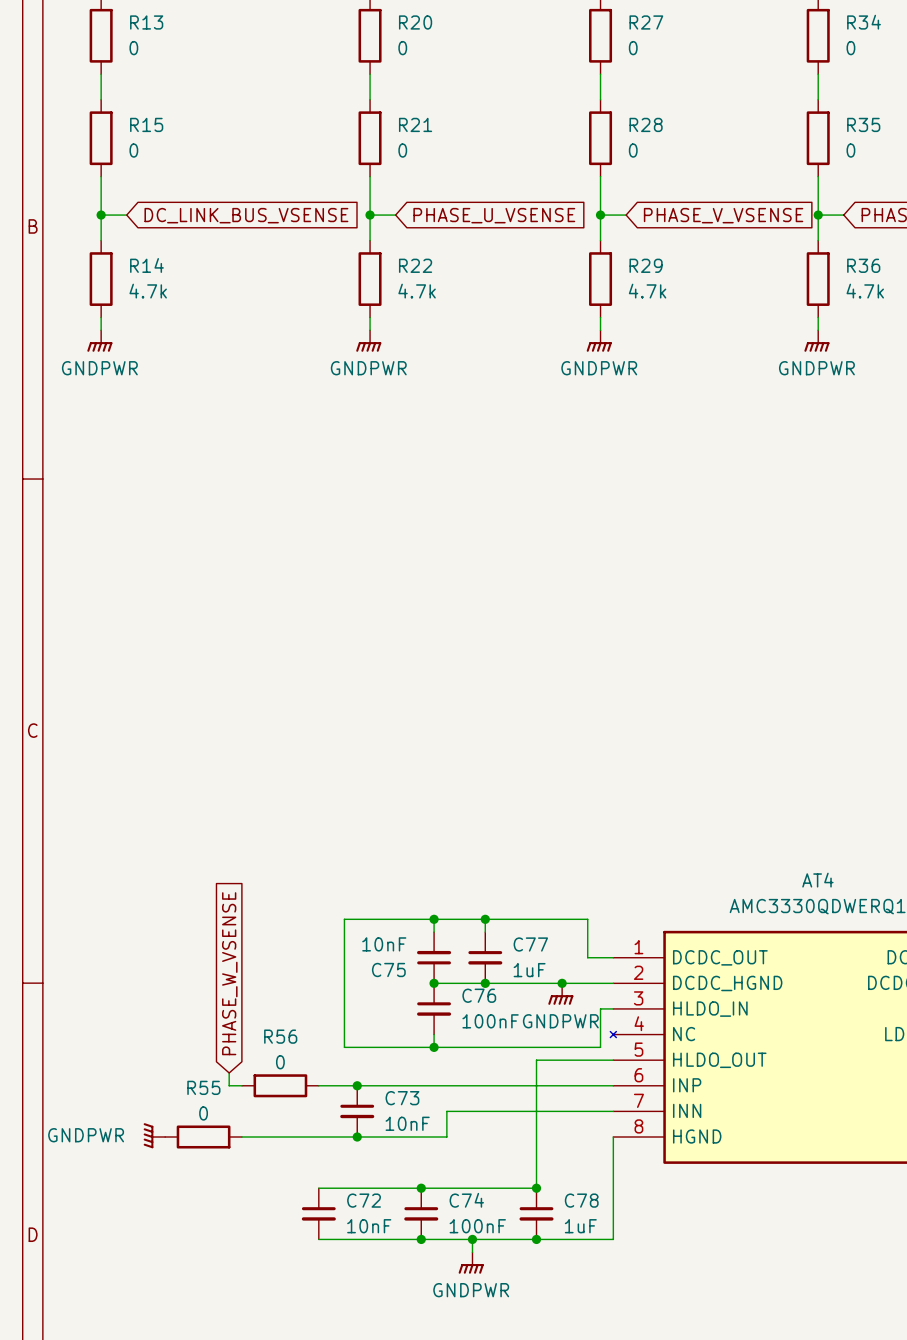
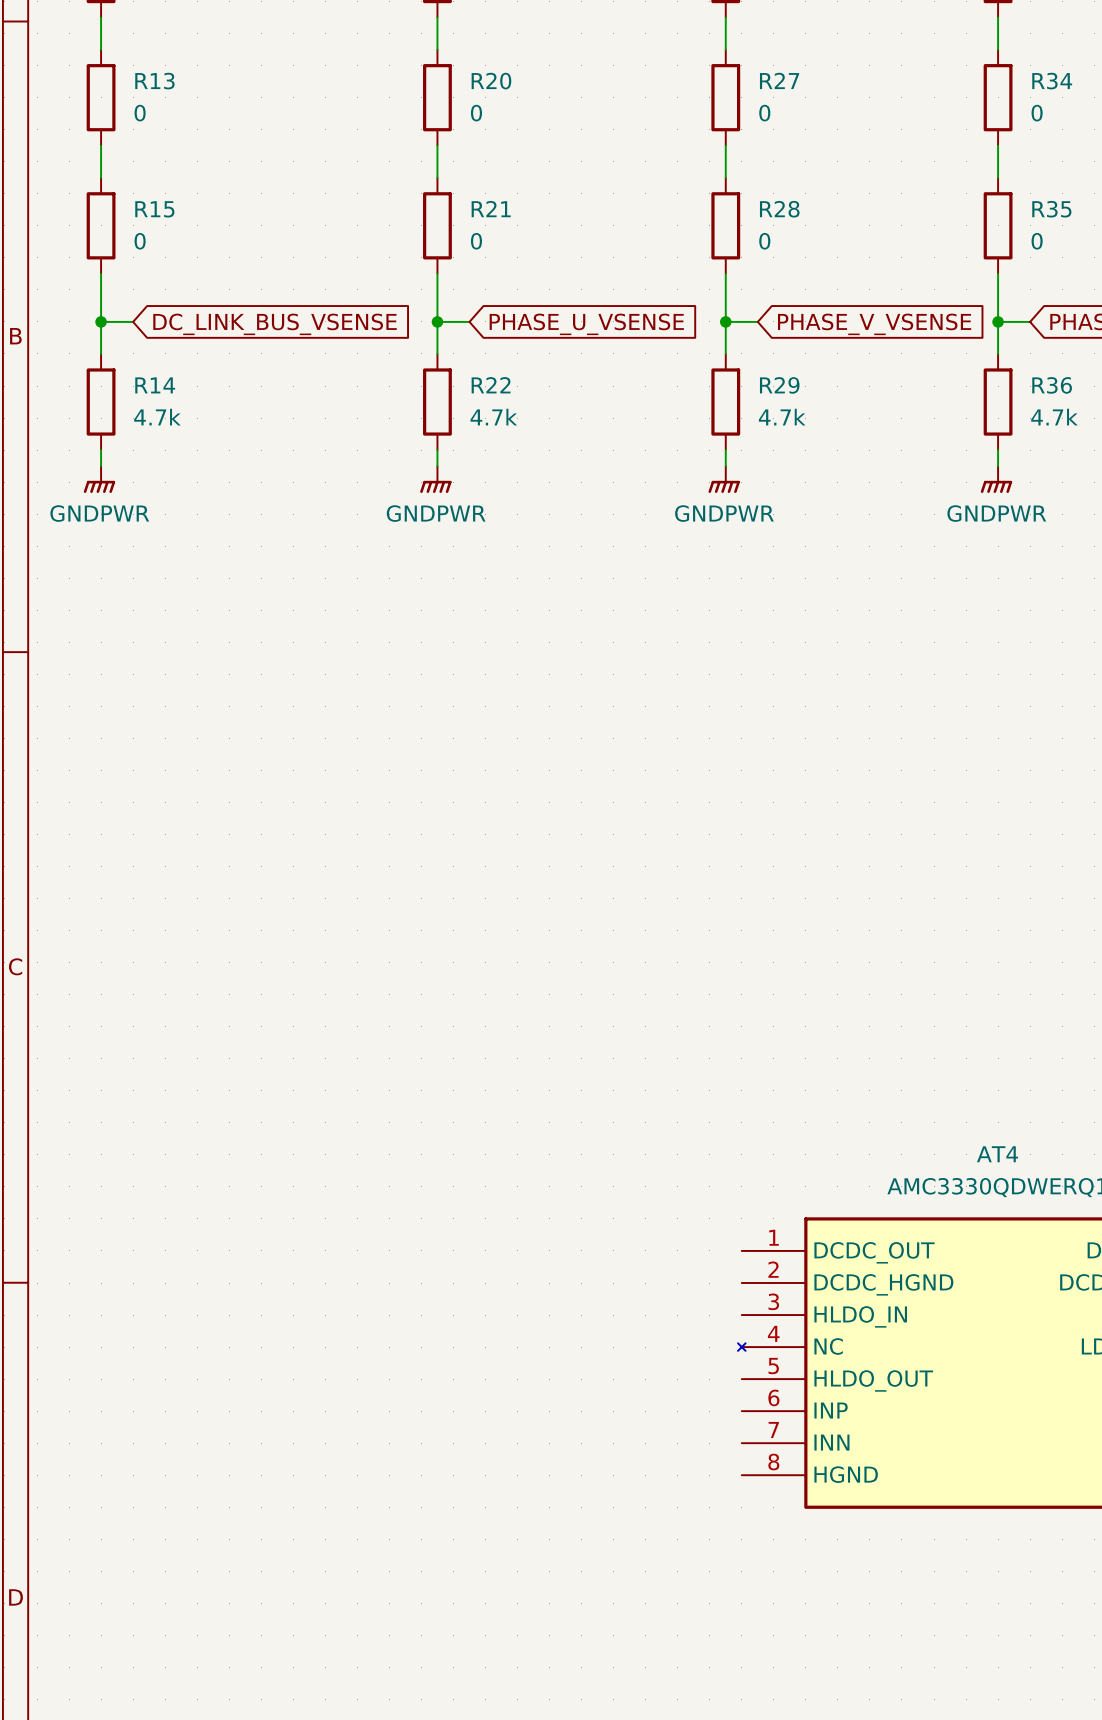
wire: (434, 919) (434, 932) -> none
junction: (434, 919) -> none
wire: (485, 919) (485, 932) -> none
junction: (485, 919) -> none
C75: 10nF (434, 957) -> none
C77: 1uF (485, 957) -> none
wire: (613, 957) (587, 957) (587, 919) (344, 919) (344, 1047) (600, 1047) (600, 1008) (613, 1008) -> none
global label: PHASE_W_VSENSE (229, 973) -> none
wire: (434, 983) (613, 983) -> none
junction: (434, 983) -> none
junction: (485, 983) -> none
junction: (562, 983) -> none
power symbol: GNDPWR (560, 994) -> none
C76: 100nF (434, 1008) -> none
wire: (434, 1034) (434, 1047) -> none
junction: (434, 1047) -> none
wire: (613, 1060) (536, 1060) (536, 1188) (318, 1188) -> none
wire: (229, 1072) (229, 1085) (241, 1085) -> none
R56: 0 (280, 1085) -> none
wire: (318, 1085) (613, 1085) -> none
junction: (357, 1085) -> none
C73: 10nF (357, 1111) -> none
wire: (613, 1111) (446, 1111) (446, 1137) (241, 1137) -> none
power symbol: GNDPWR (154, 1135) -> none
R55: 0 (203, 1137) -> none
junction: (357, 1137) -> none
wire: (613, 1137) (613, 1239) (318, 1239) -> none
junction: (421, 1188) -> none
junction: (536, 1188) -> none
C72: 10nF (318, 1213) -> none
C74: 100nF (421, 1213) -> none
C78: 1uF (536, 1213) -> none
junction: (421, 1239) -> none
wire: (472, 1239) (472, 1252) -> none
junction: (472, 1239) -> none
junction: (536, 1239) -> none
power symbol: GNDPWR (471, 1263) -> none

